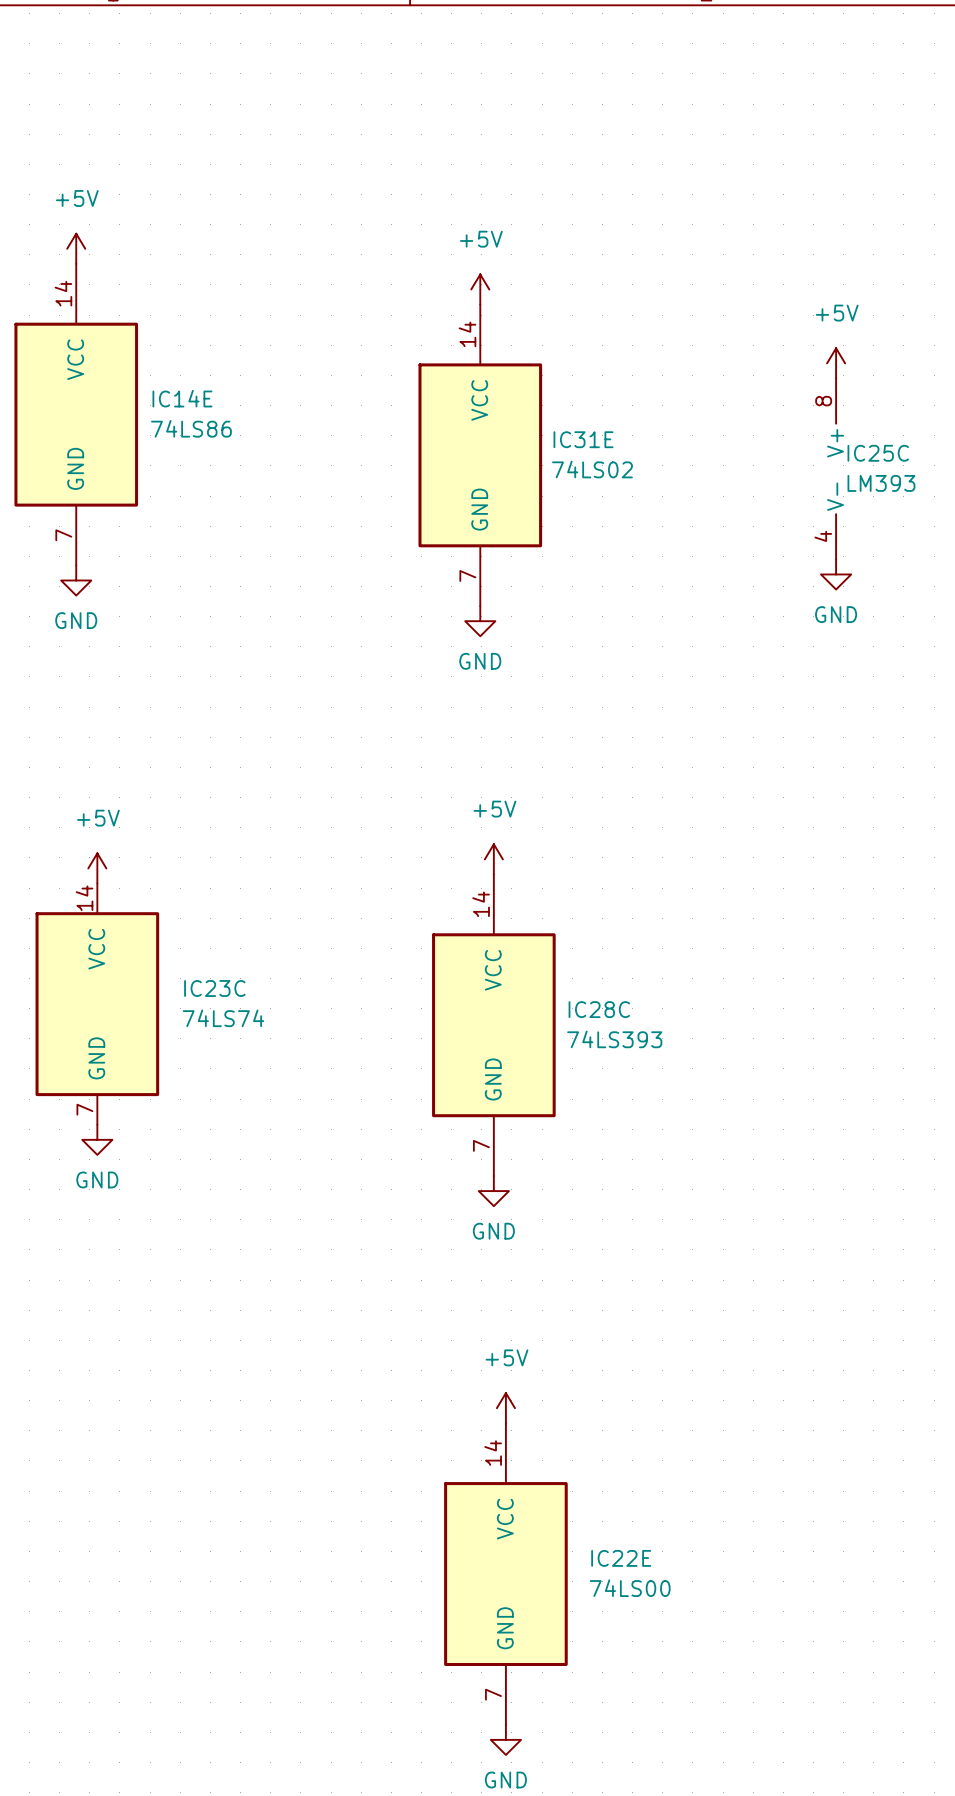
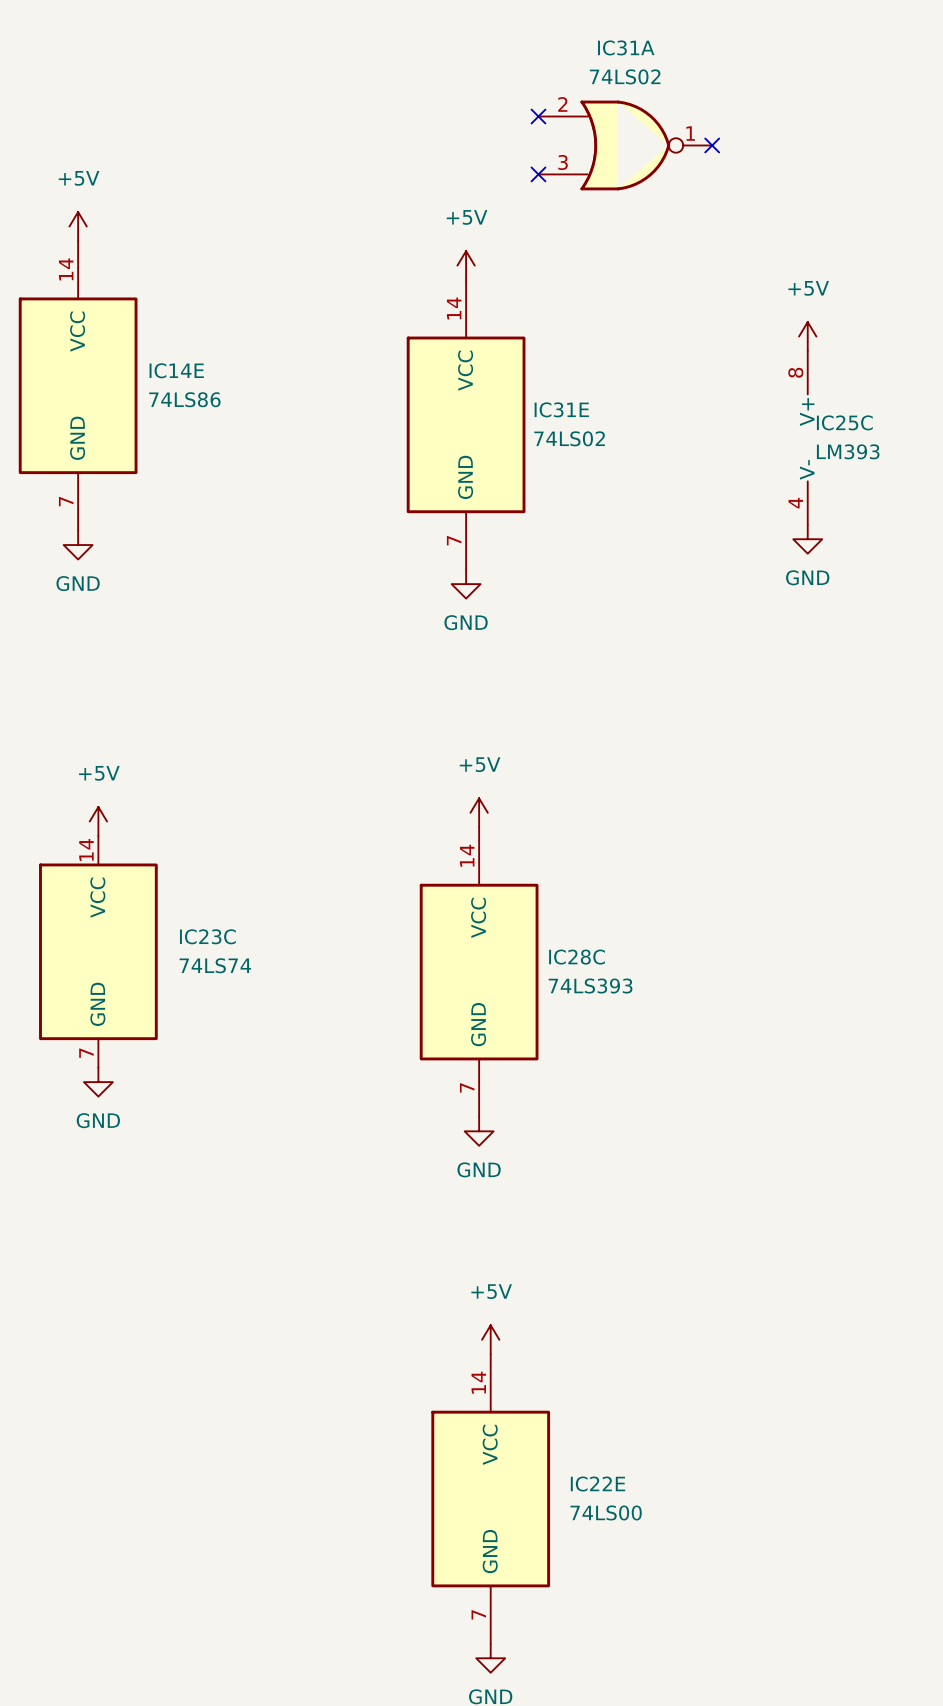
no-connect mark: none -> (538, 116)
IC31A: none -> 74LS02 (625, 145)
no-connect mark: none -> (712, 145)
no-connect mark: none -> (538, 174)

